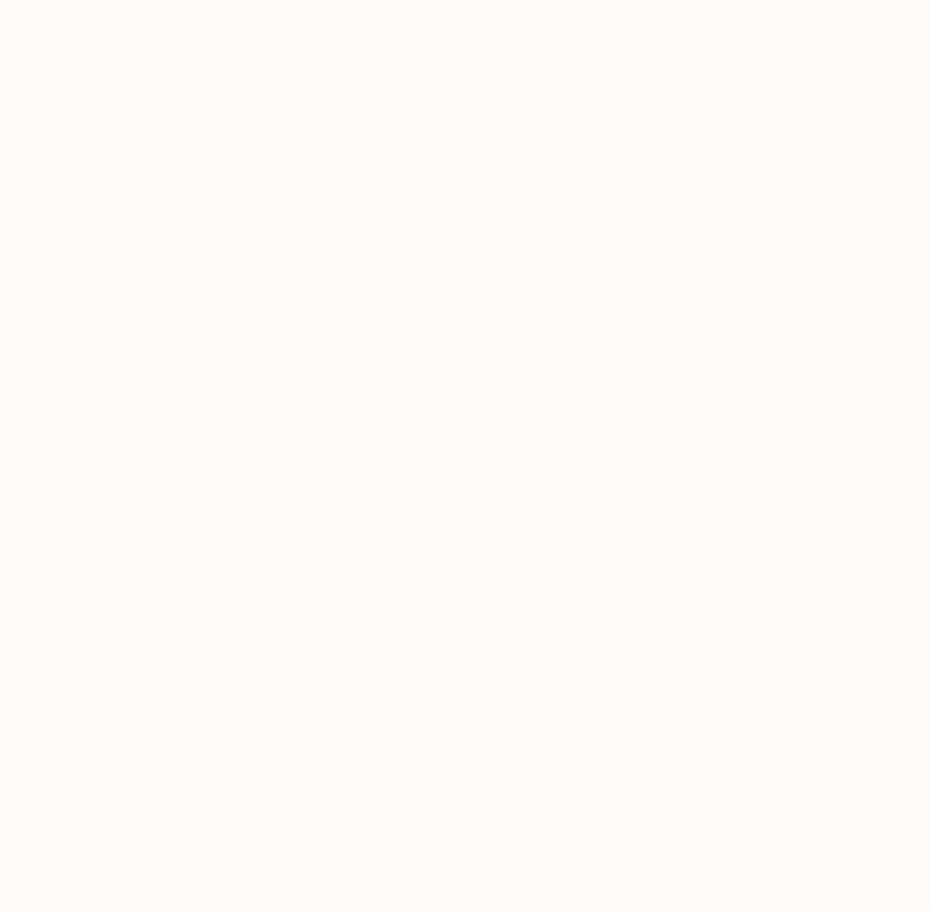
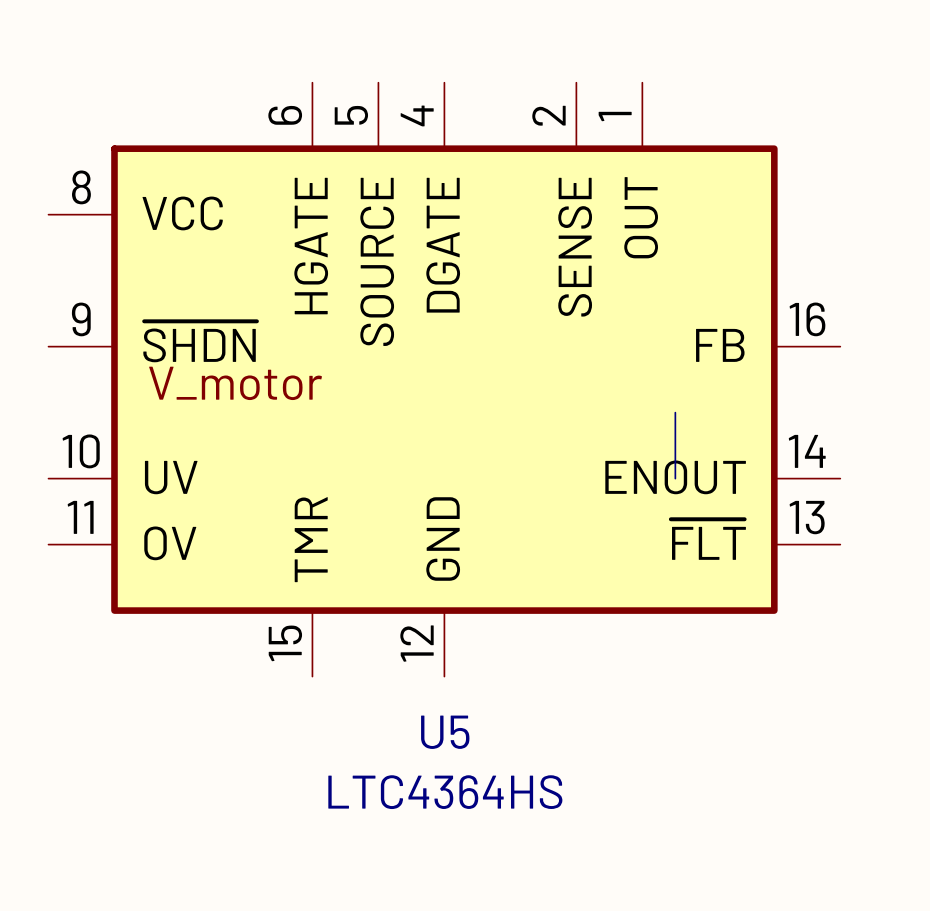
U5: none -> LTC4364HS (444, 379)
label: none -> V_motor (235, 383)
wire: none -> (675, 412) (675, 478)

